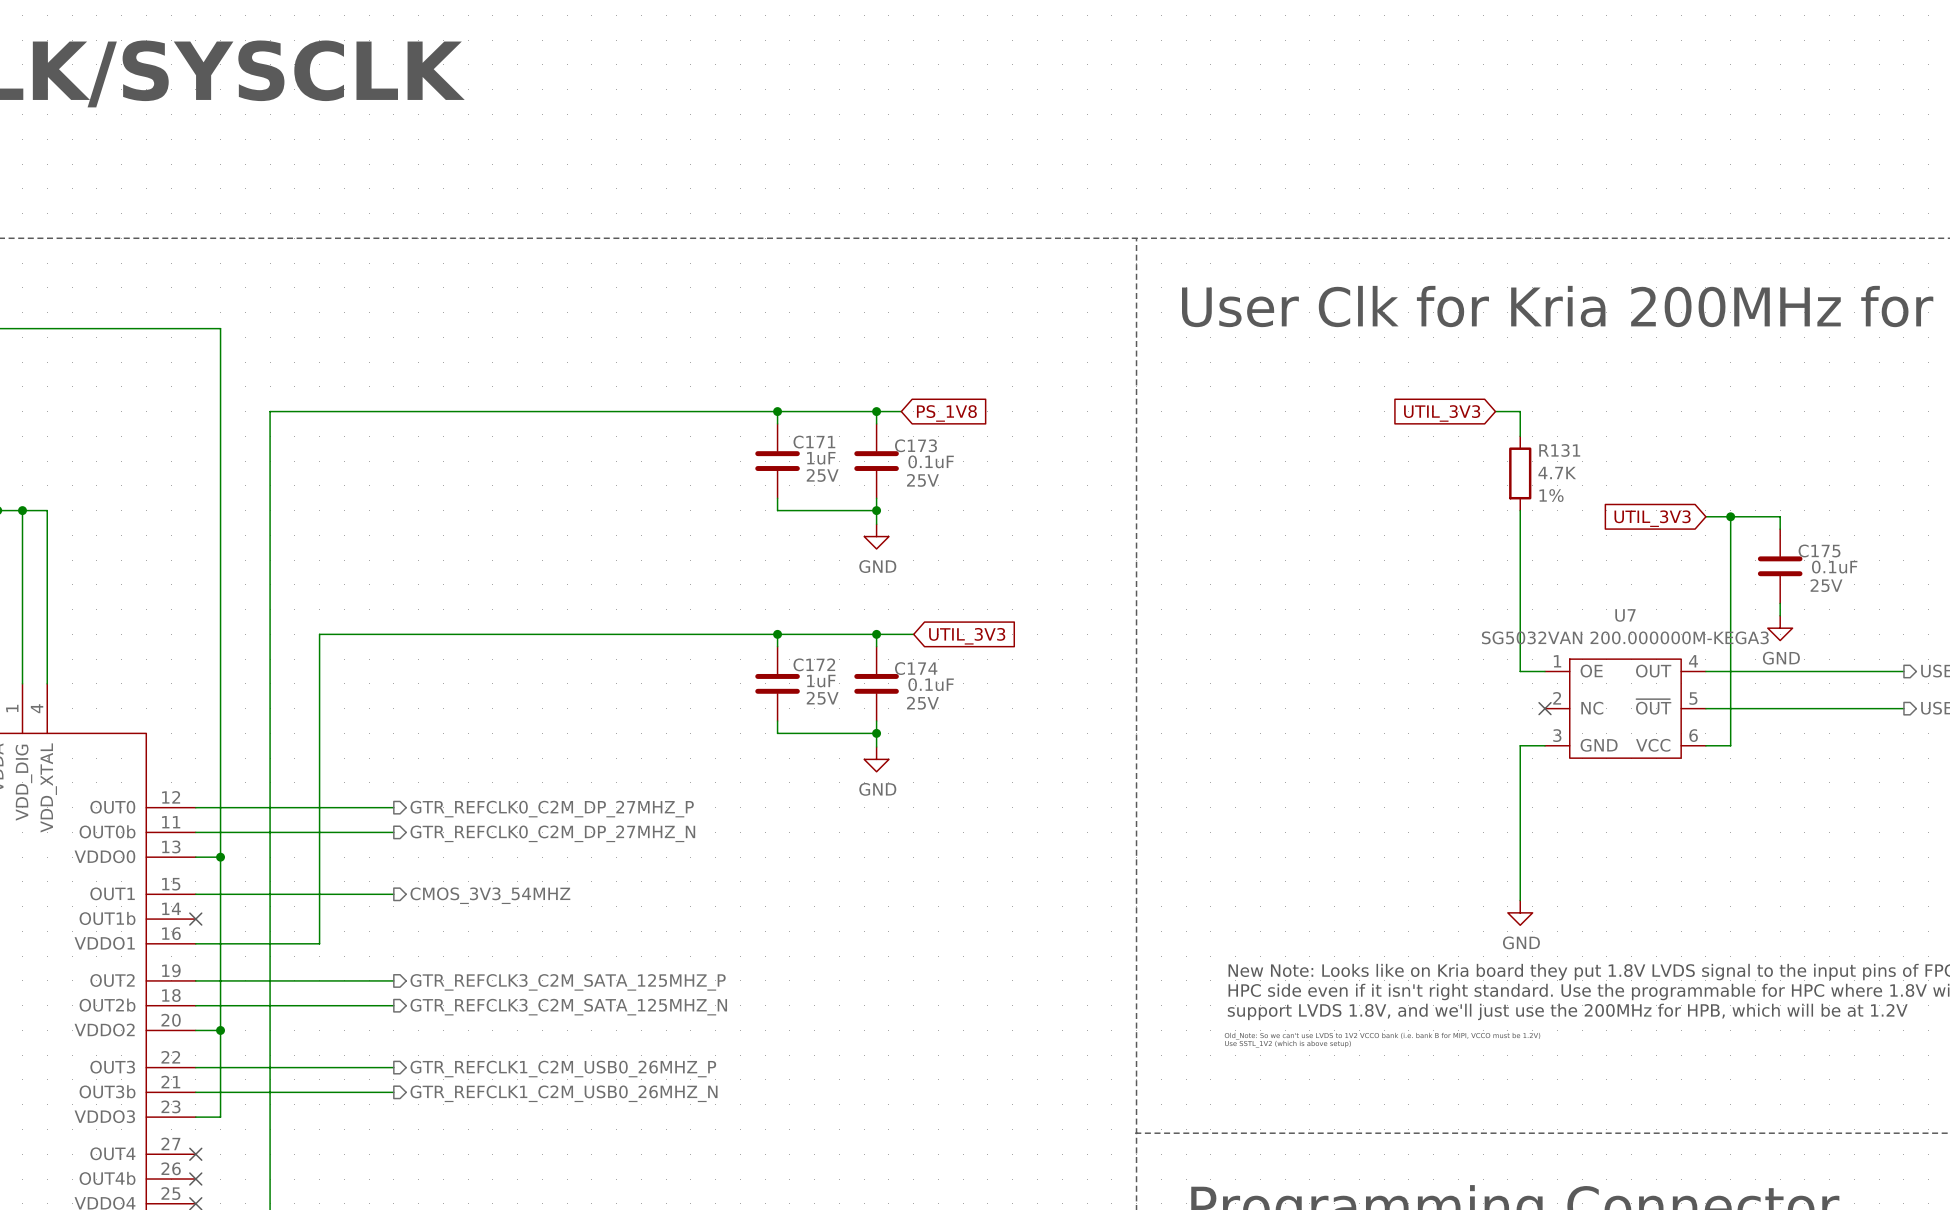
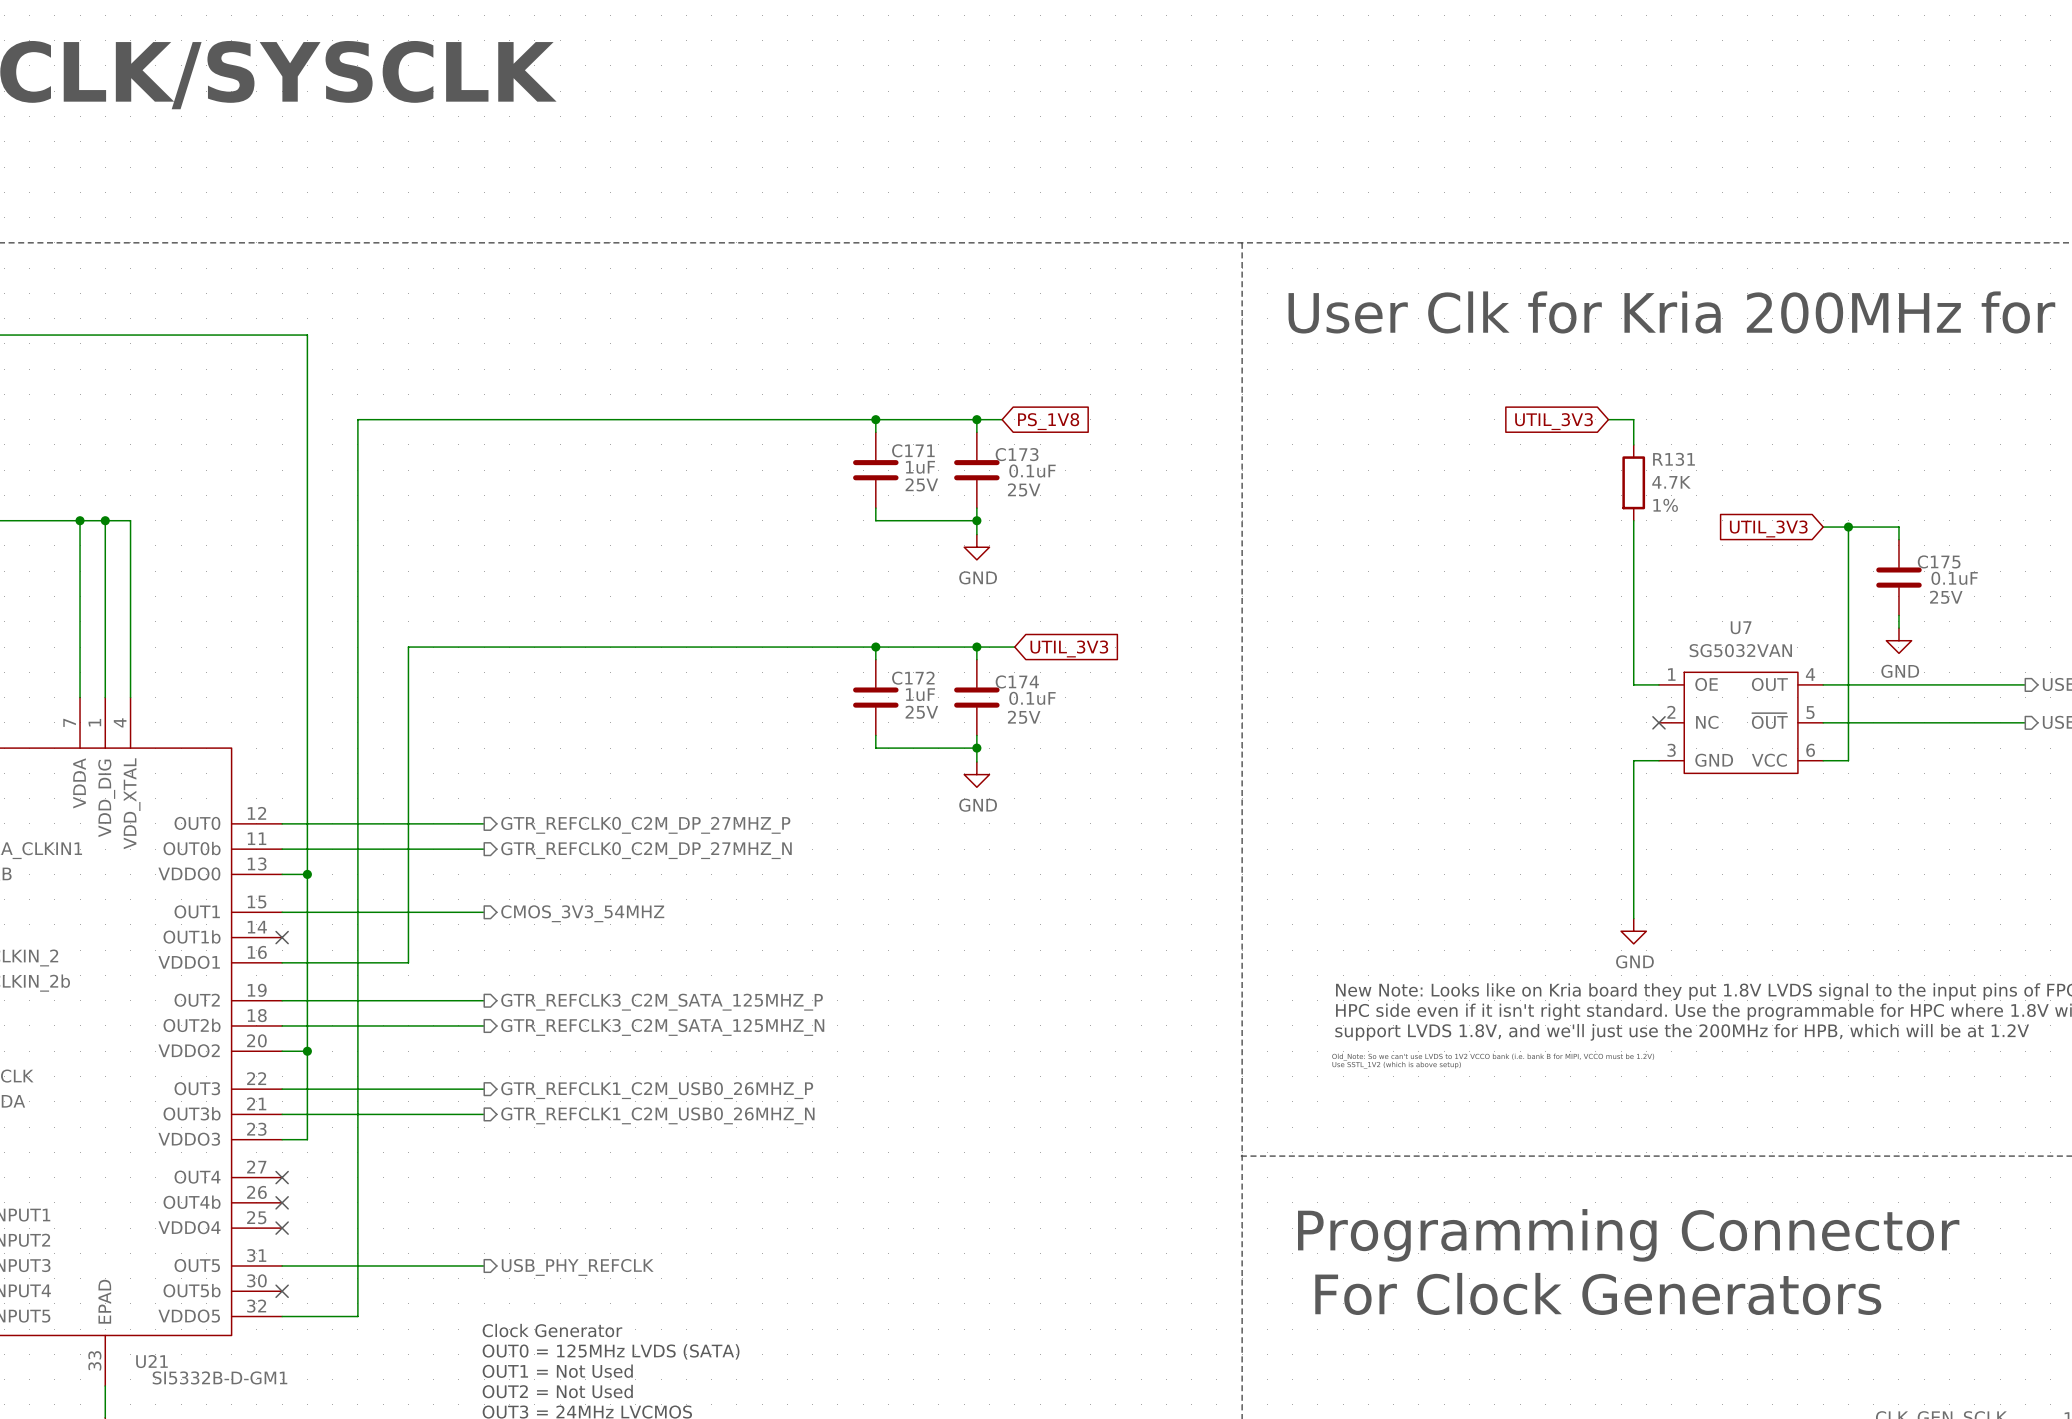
U7 value: SG5032VAN 200.000000M-KEGA3 (1625, 637) -> SG5032VAN (1740, 650)

